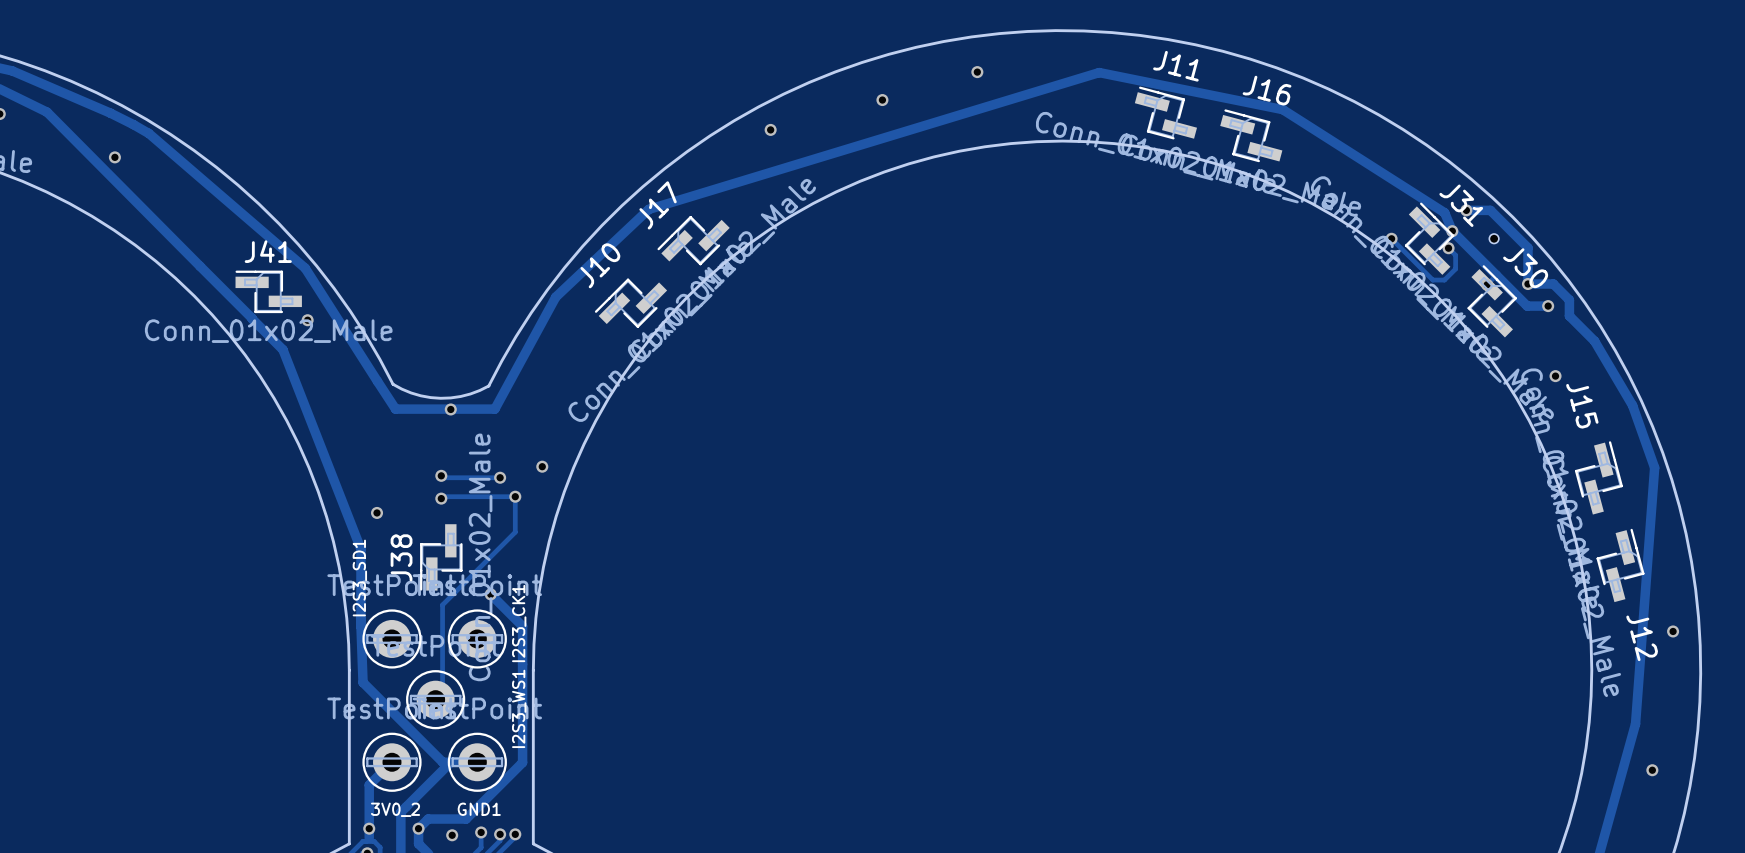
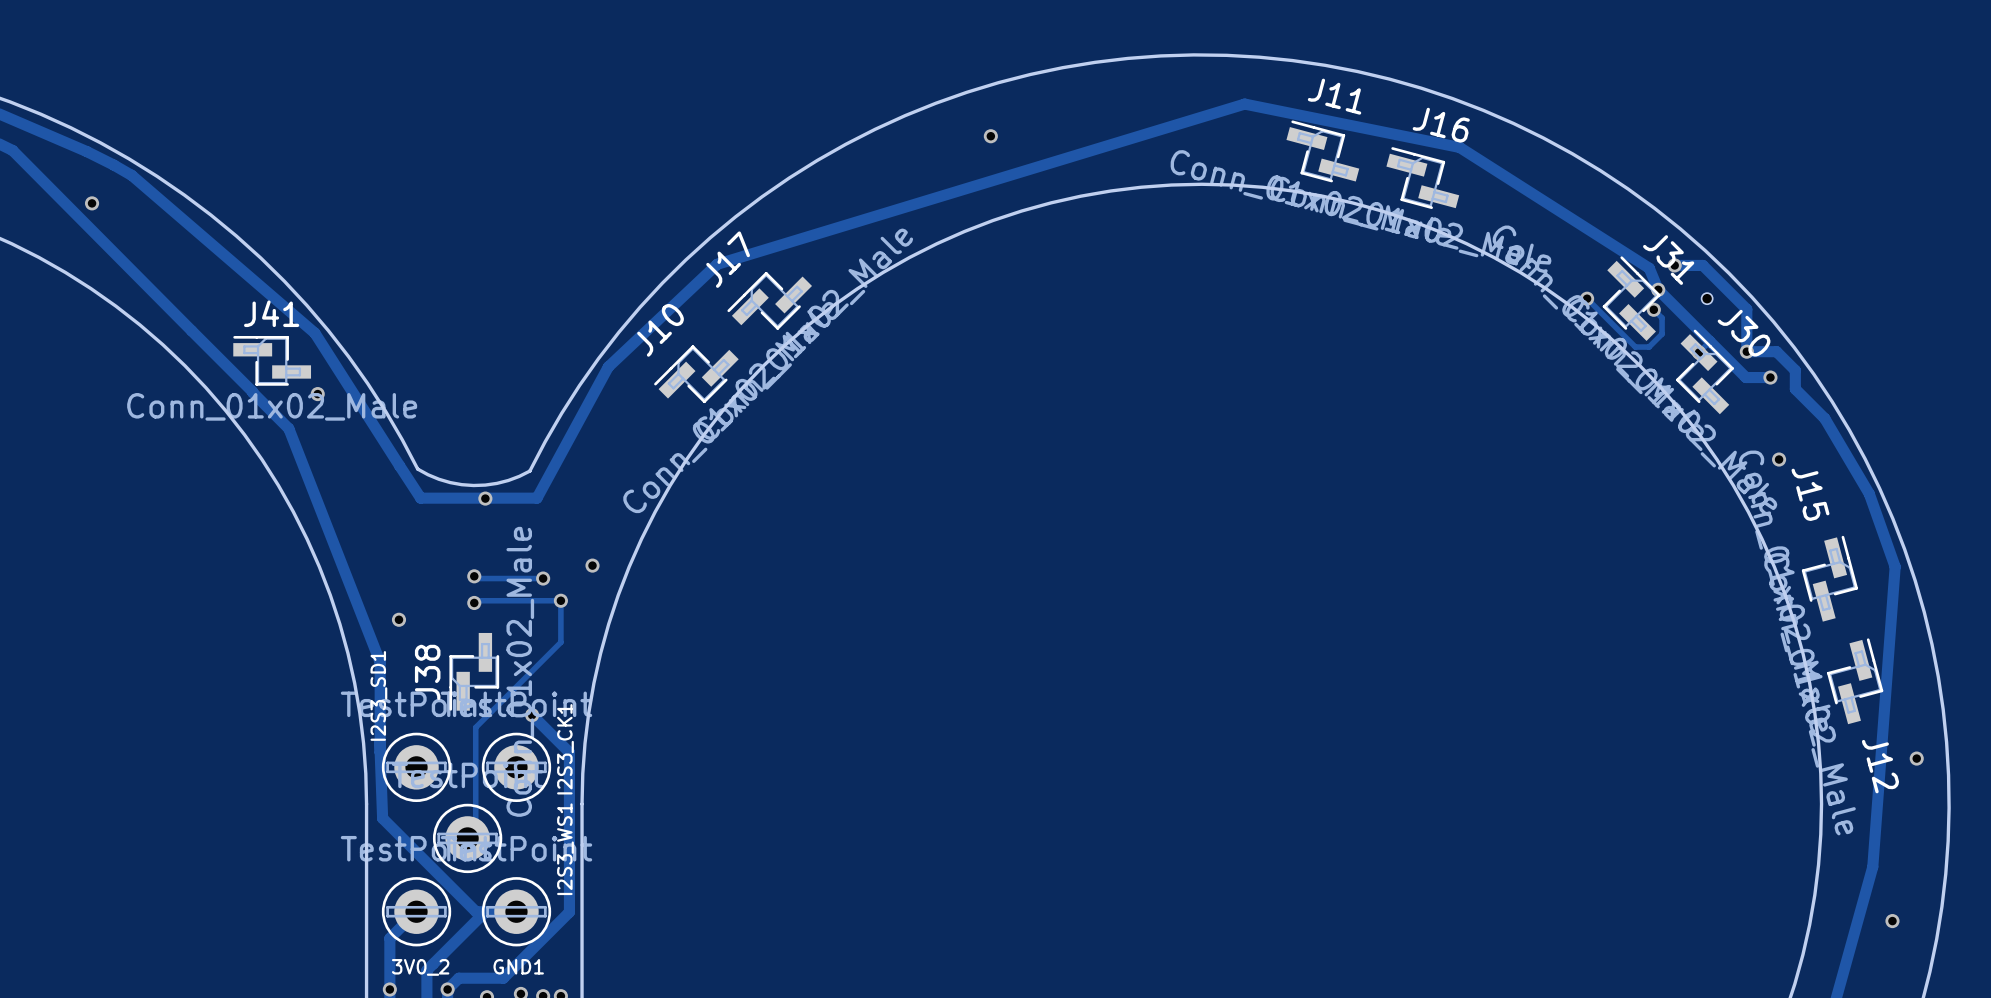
via: (977, 72) -> none
via: (770, 129) -> none

